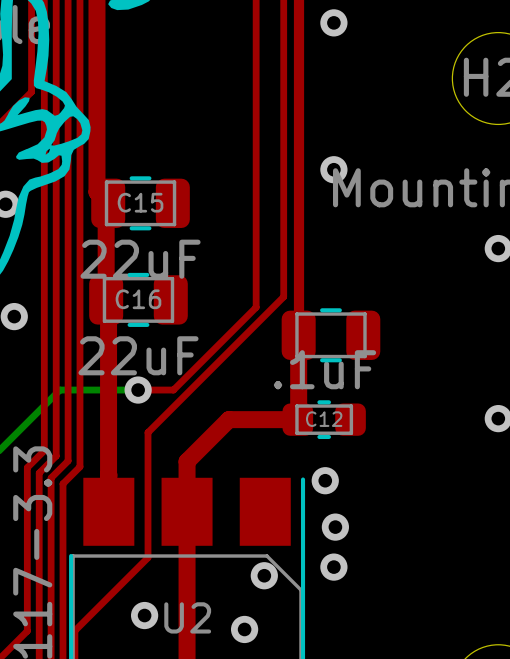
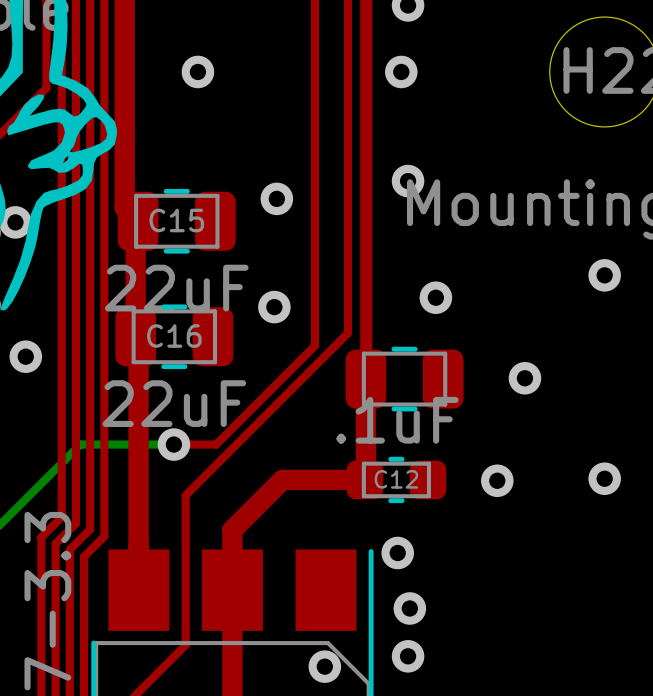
via: none -> (197, 71)
via: none -> (401, 71)
via: none -> (276, 198)
via: none -> (435, 297)
via: none -> (274, 307)
via: none -> (524, 378)
via: none -> (497, 480)

